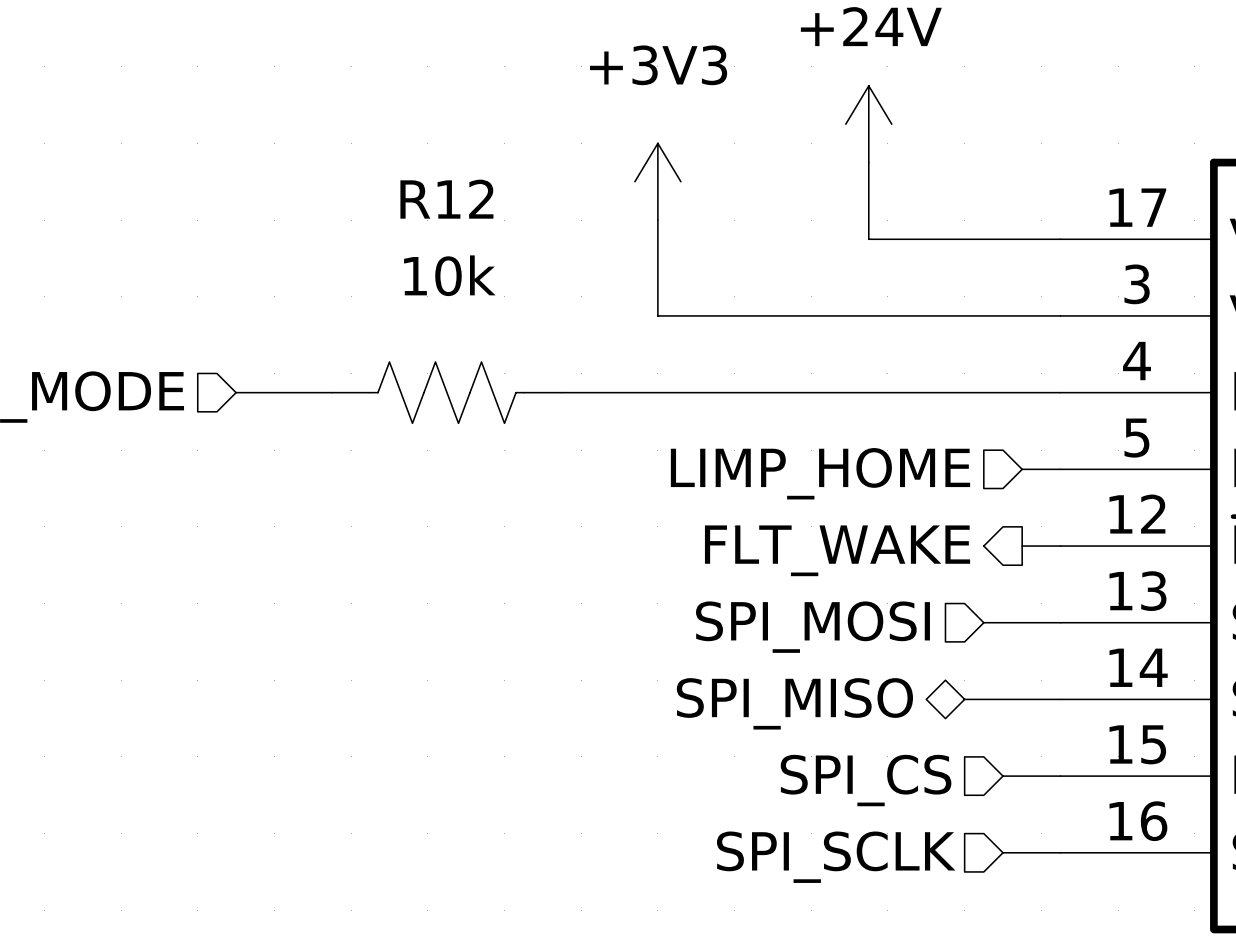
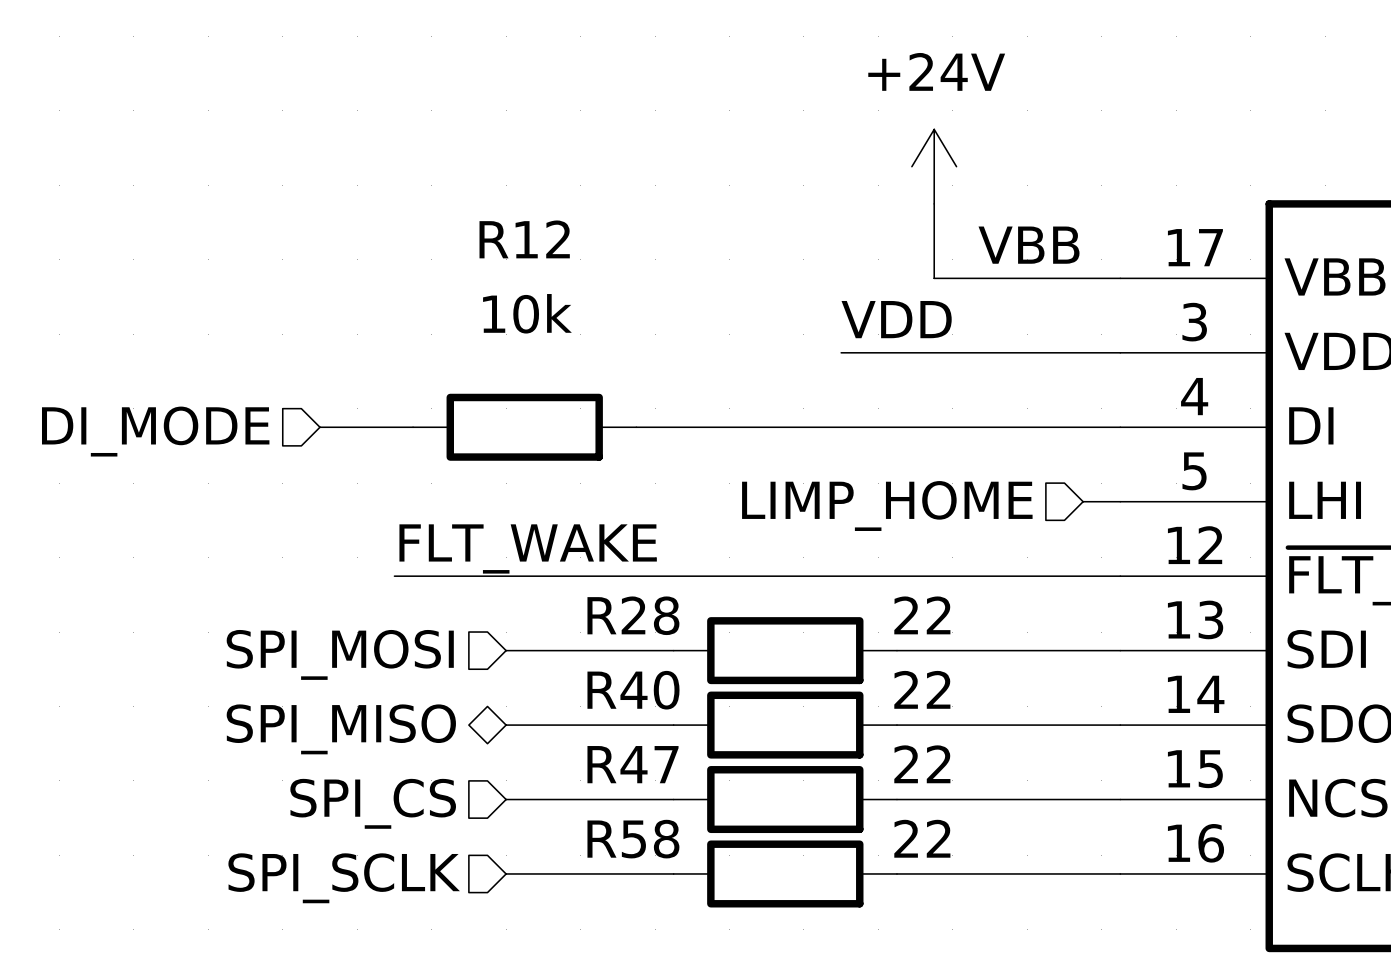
power symbol: +3V3 (657, 181) -> none
label: none -> VBB (1029, 245)
wire: (657, 220) (657, 315) (772, 315) -> none
label: none -> VDD (896, 319)
R12 symbol: [331, 361, 563, 424] -> [413, 393, 637, 461]
label: none -> FLT_WAKE (528, 548)
wire: none -> (394, 576) (1083, 576)
hierarchical label: FLT_WAKE (837, 550) -> none
wire: none -> (506, 650) (673, 650)
R28: none -> 22 (785, 650)
wire: none -> (896, 650) (1045, 650)
hierarchical label position: SPI_MOSI (812, 627) -> SPI_MOSI (340, 654)
wire: none -> (506, 725) (673, 725)
R40: none -> 22 (785, 725)
wire: none -> (896, 725) (1027, 725)
hierarchical label position: SPI_MISO (794, 703) -> SPI_MISO (341, 729)
wire: none -> (506, 799) (673, 799)
R47: none -> 22 (785, 799)
wire: none -> (896, 799) (1064, 799)
hierarchical label position: SPI_CS (866, 780) -> SPI_CS (373, 803)
wire: none -> (506, 873) (673, 873)
R58: none -> 22 (785, 873)
wire: none -> (896, 873) (1064, 873)
hierarchical label position: SPI_SCLK (836, 857) -> SPI_SCLK (344, 878)

